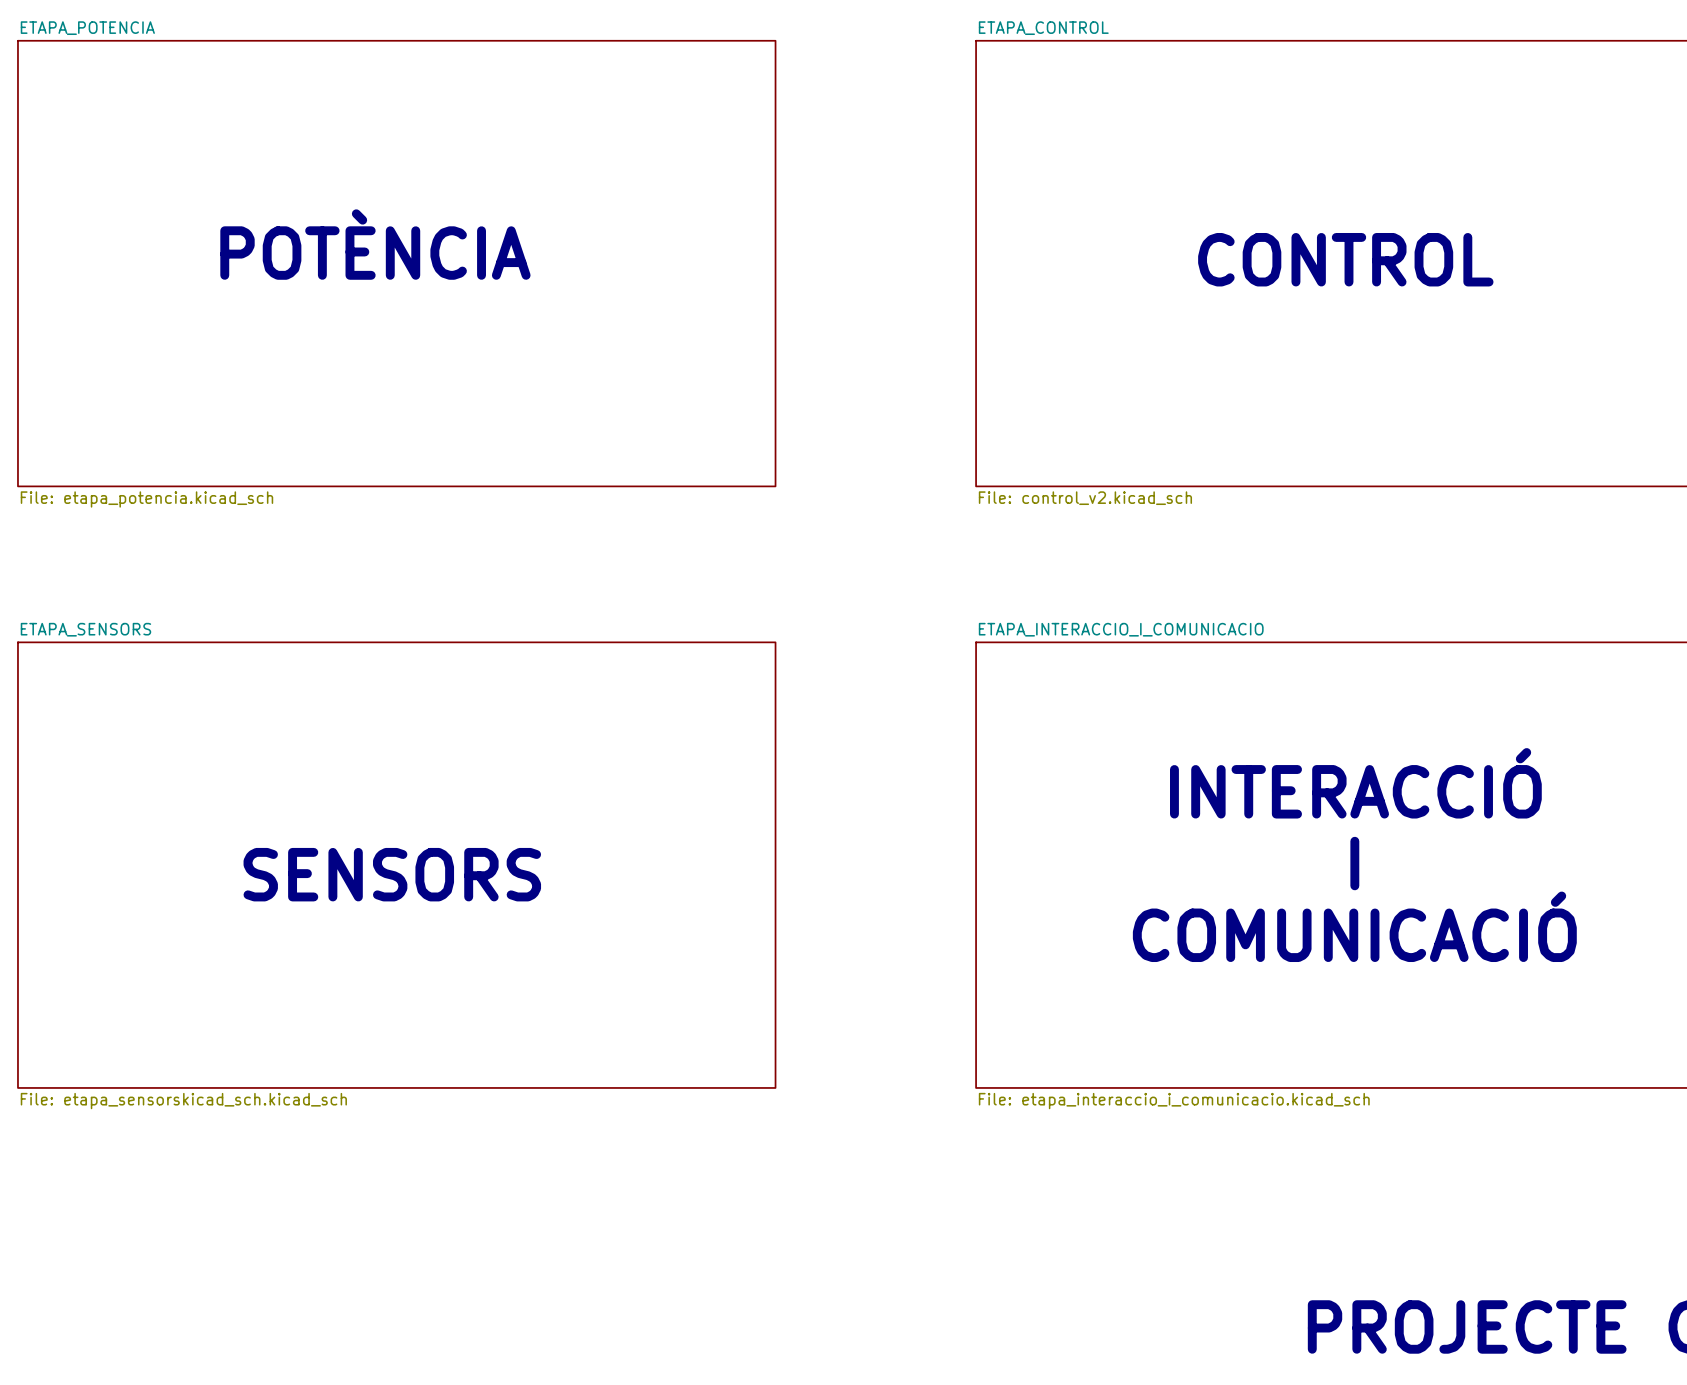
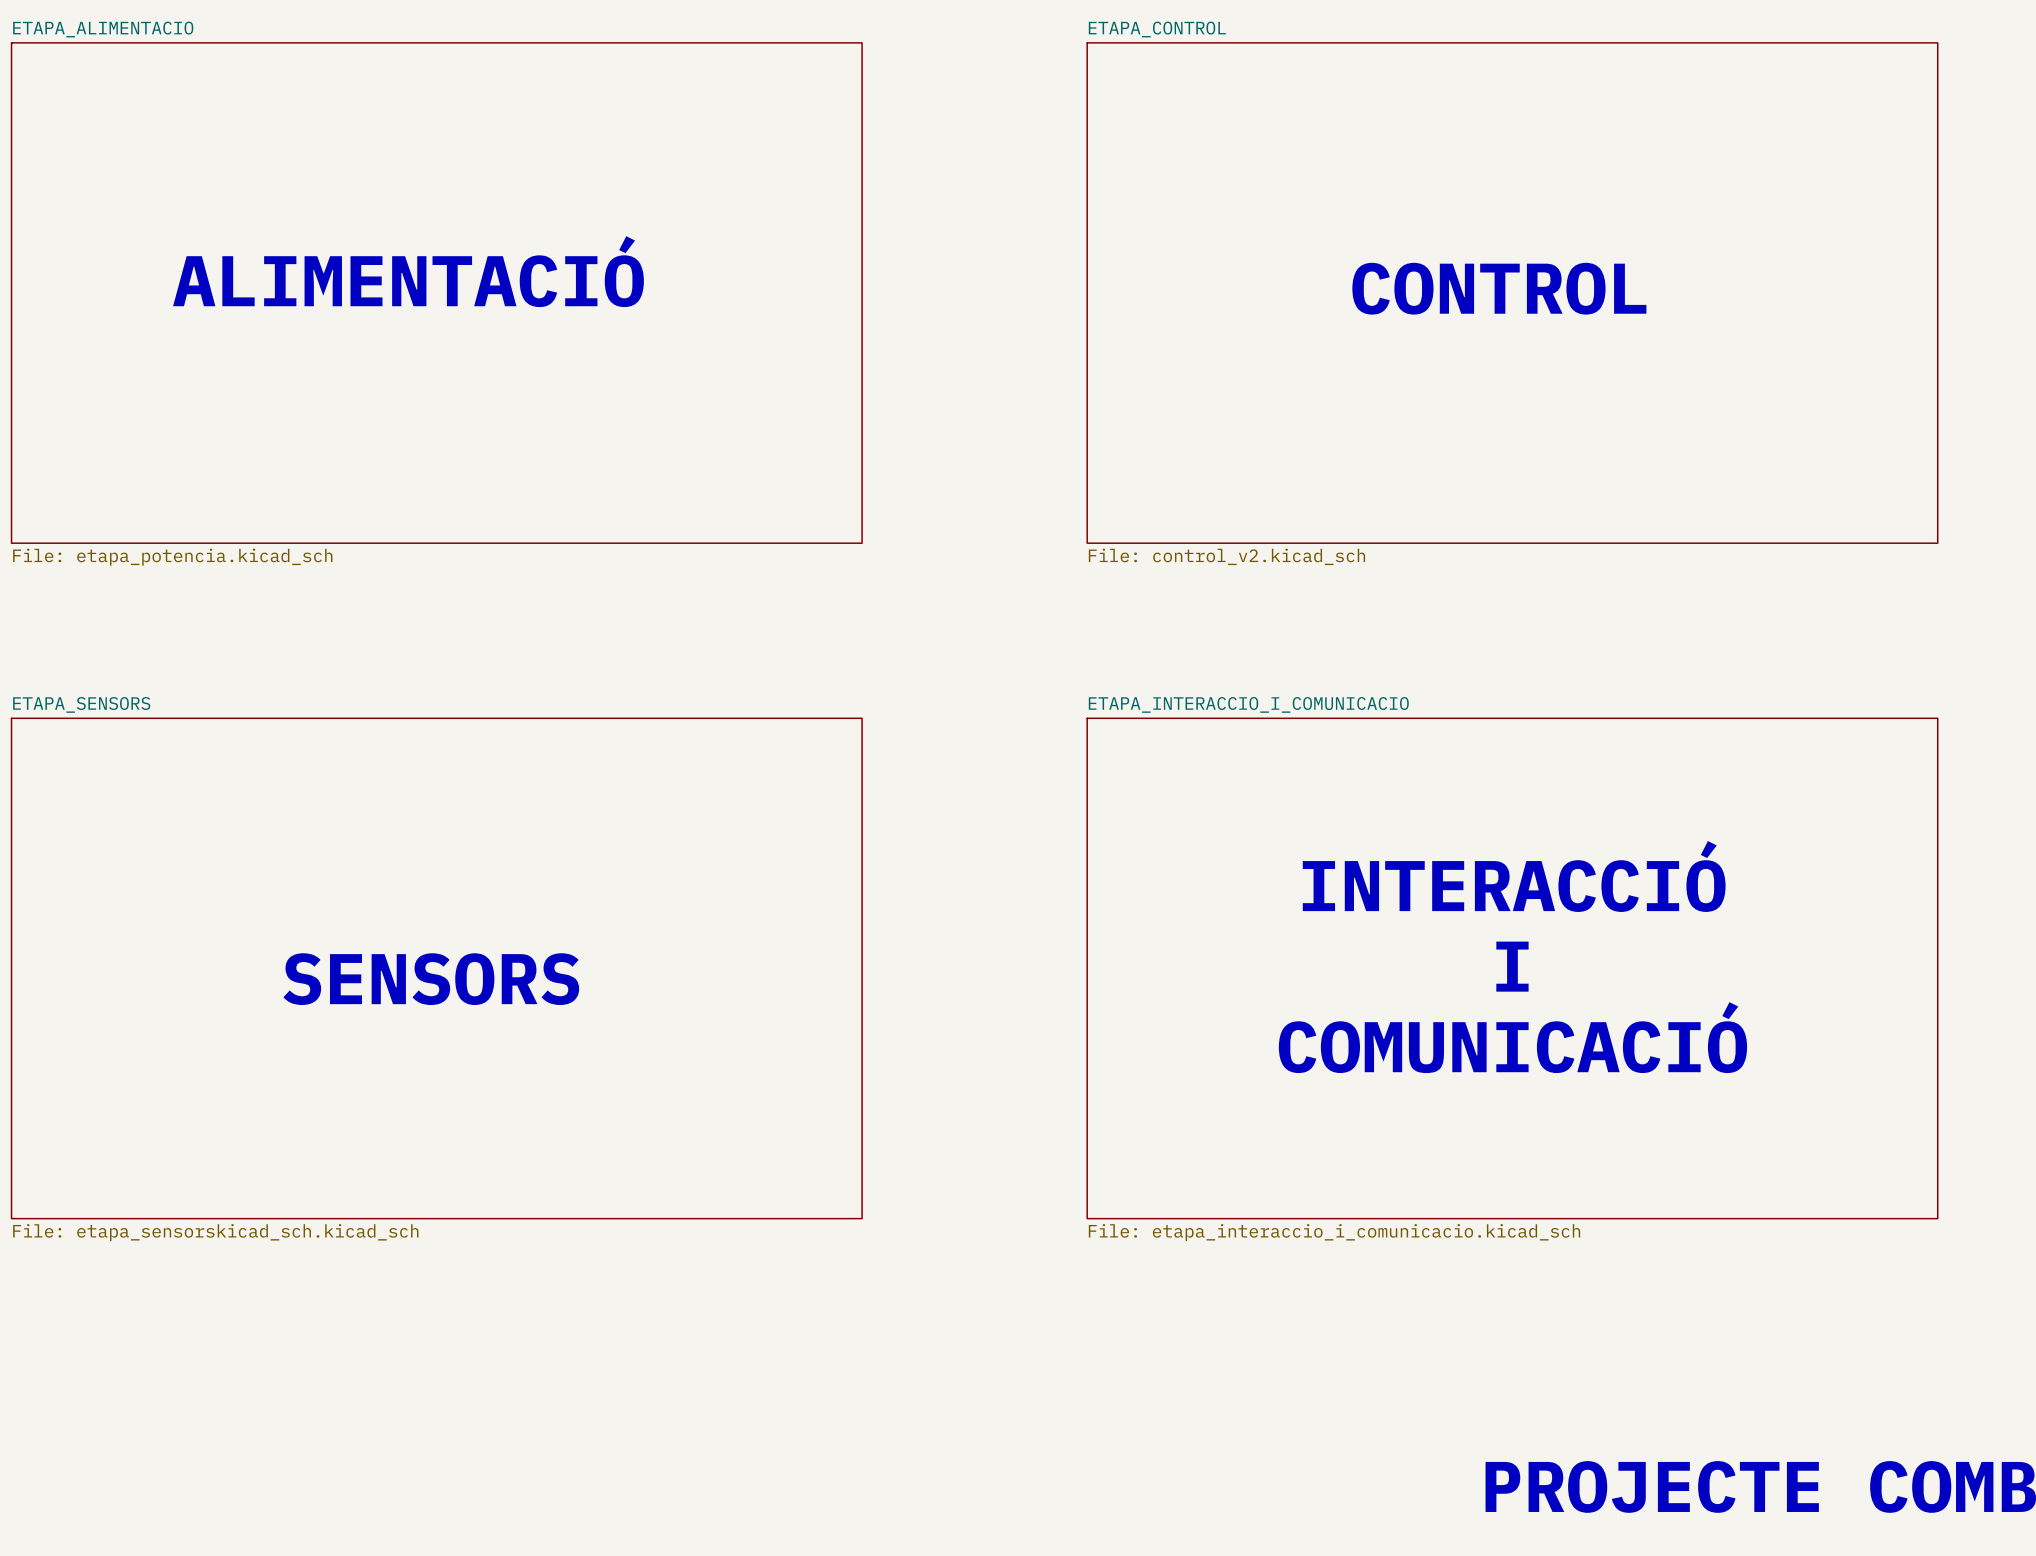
sheet ETAPA_POTENCIA name: ETAPA_POTENCIA (87, 28) -> ETAPA_ALIMENTACIO (103, 29)
text: POTÈNCIA (375, 244) -> ALIMENTACIÓ (408, 271)

